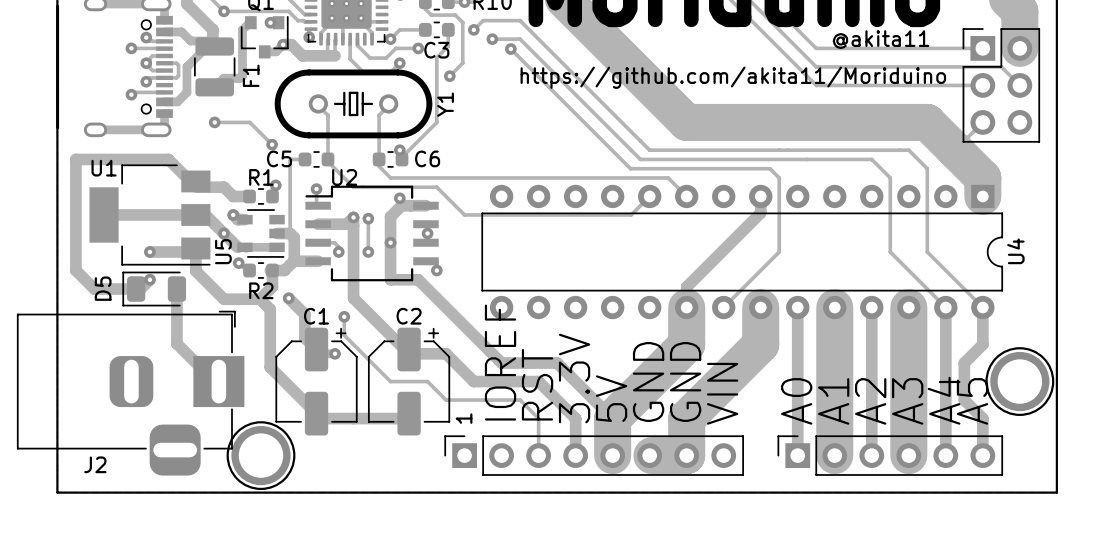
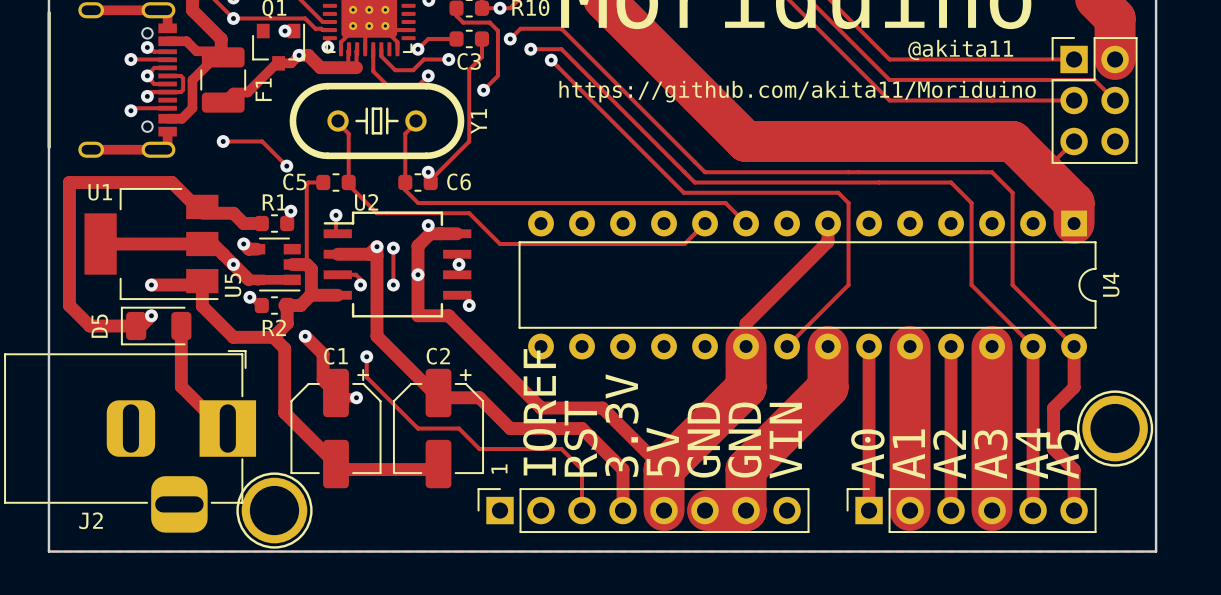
track: (251, 20) (242, 29) (242, 76) (236, 78) -> (276, 63) (247, 92)

